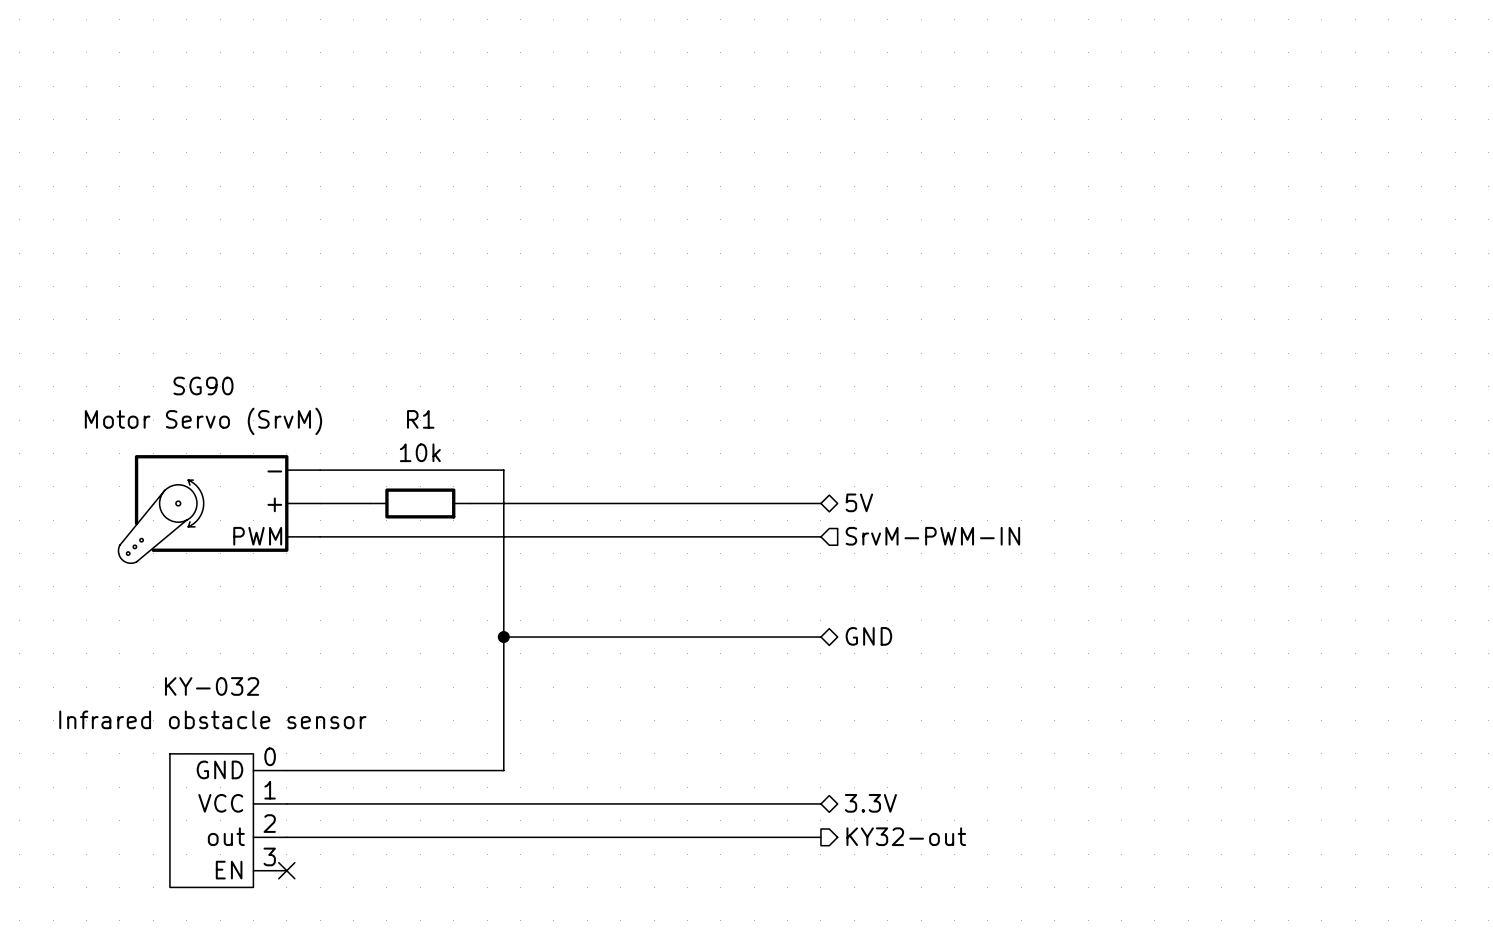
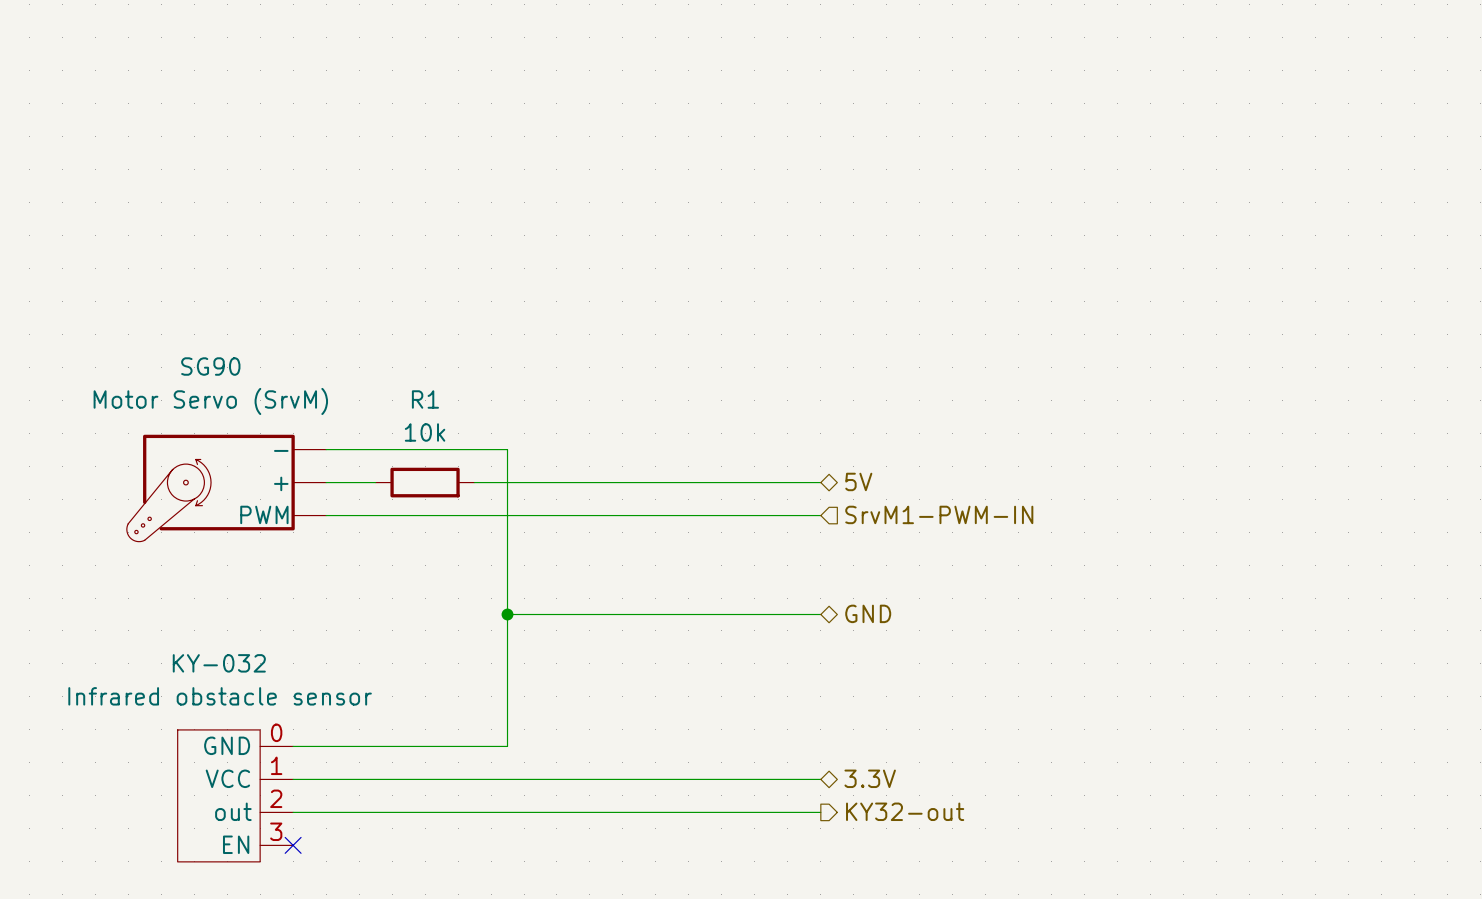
hierarchical label: SrvM-PWM-IN (932, 536) -> SrvM1-PWM-IN (939, 514)

